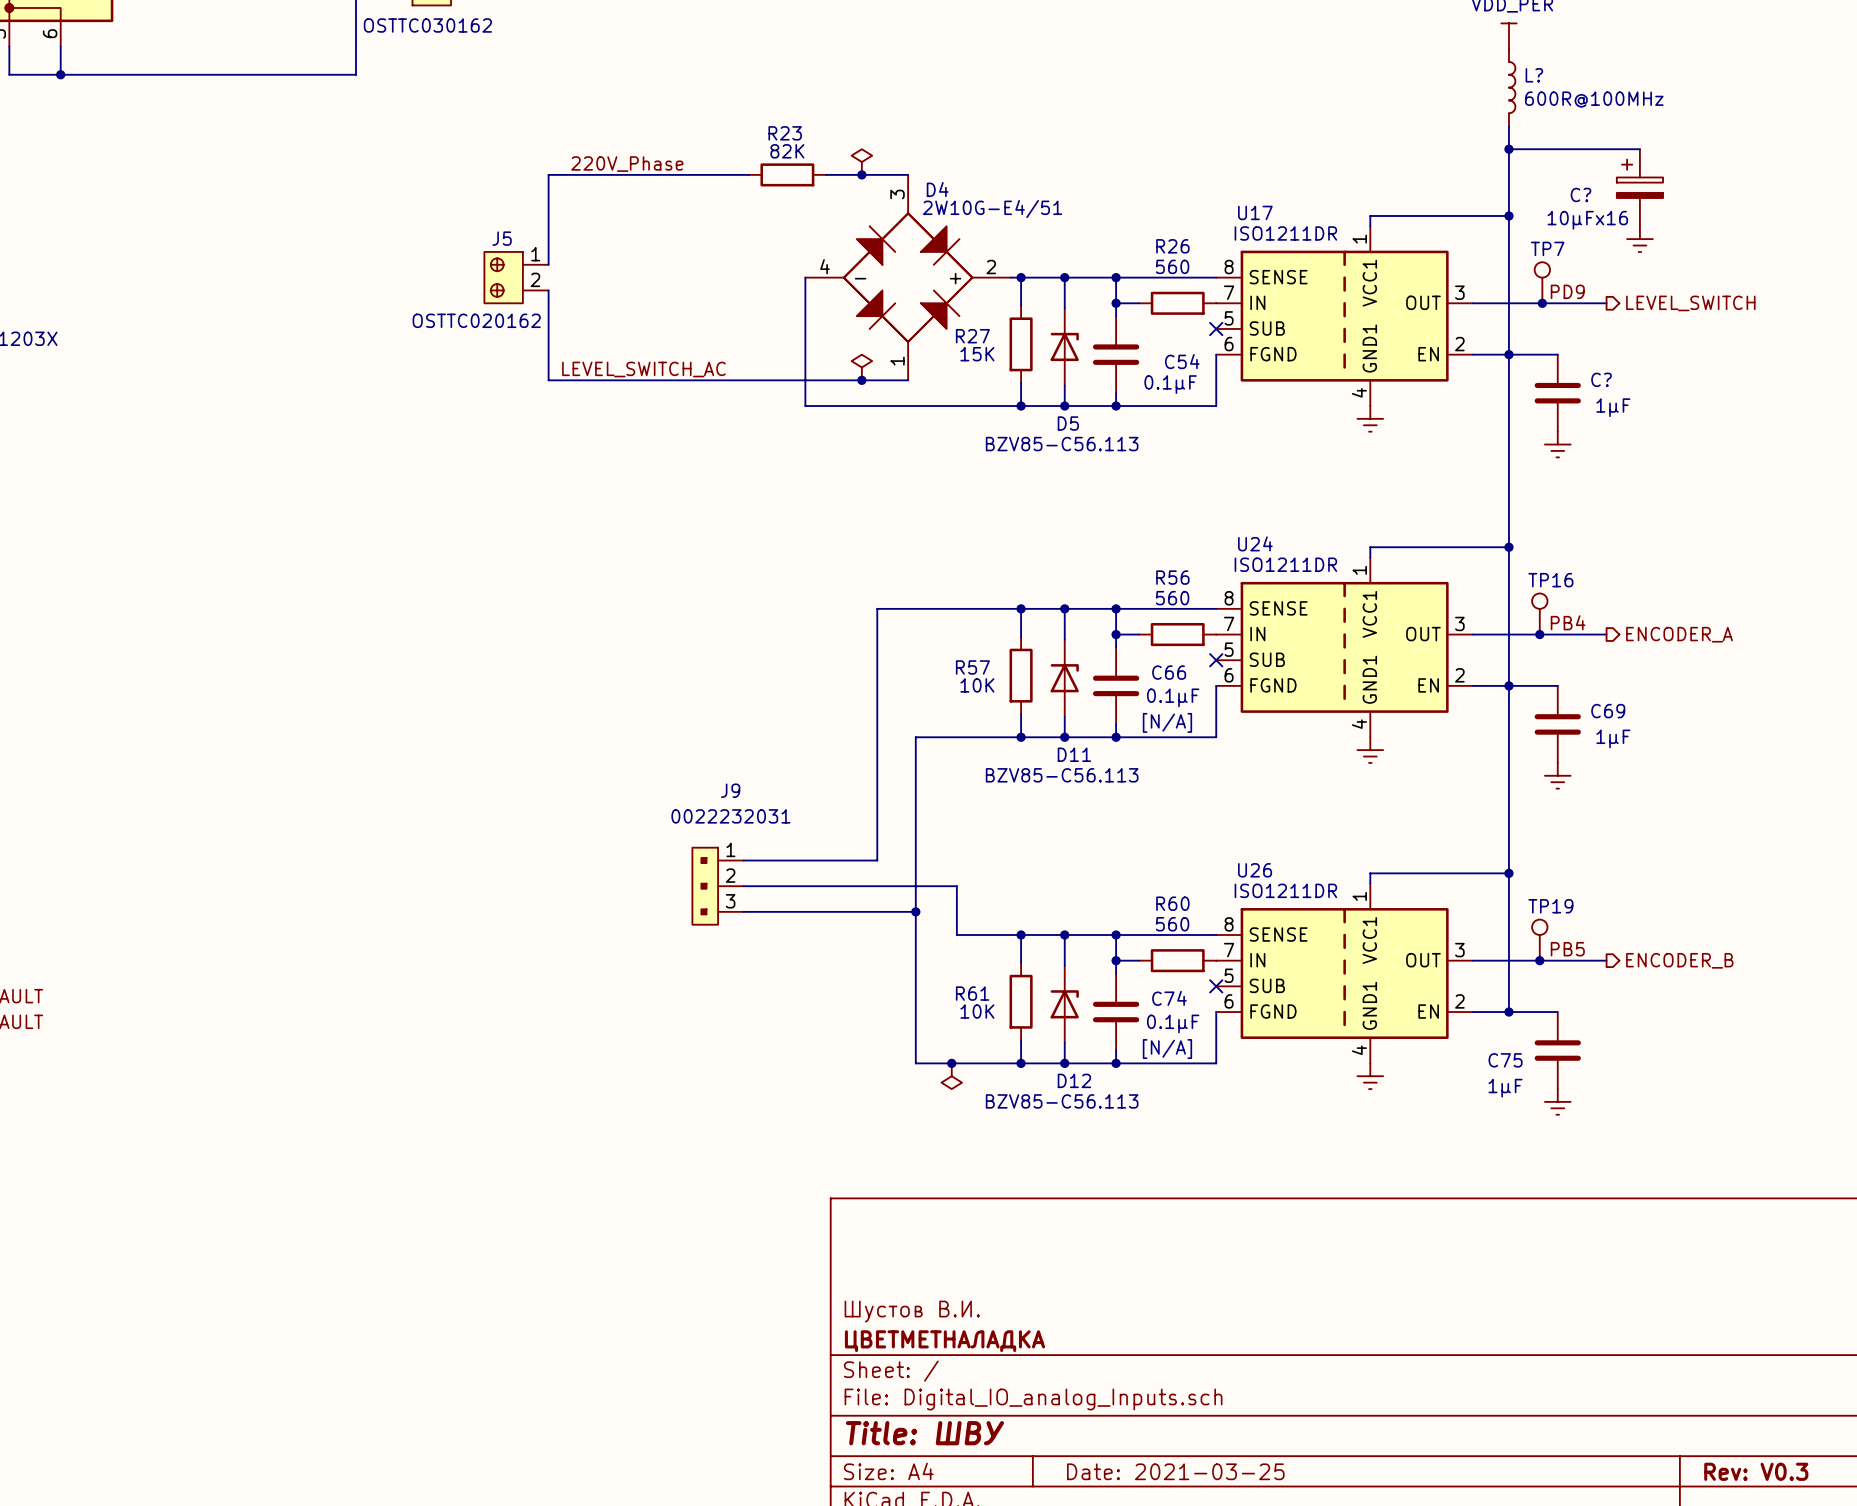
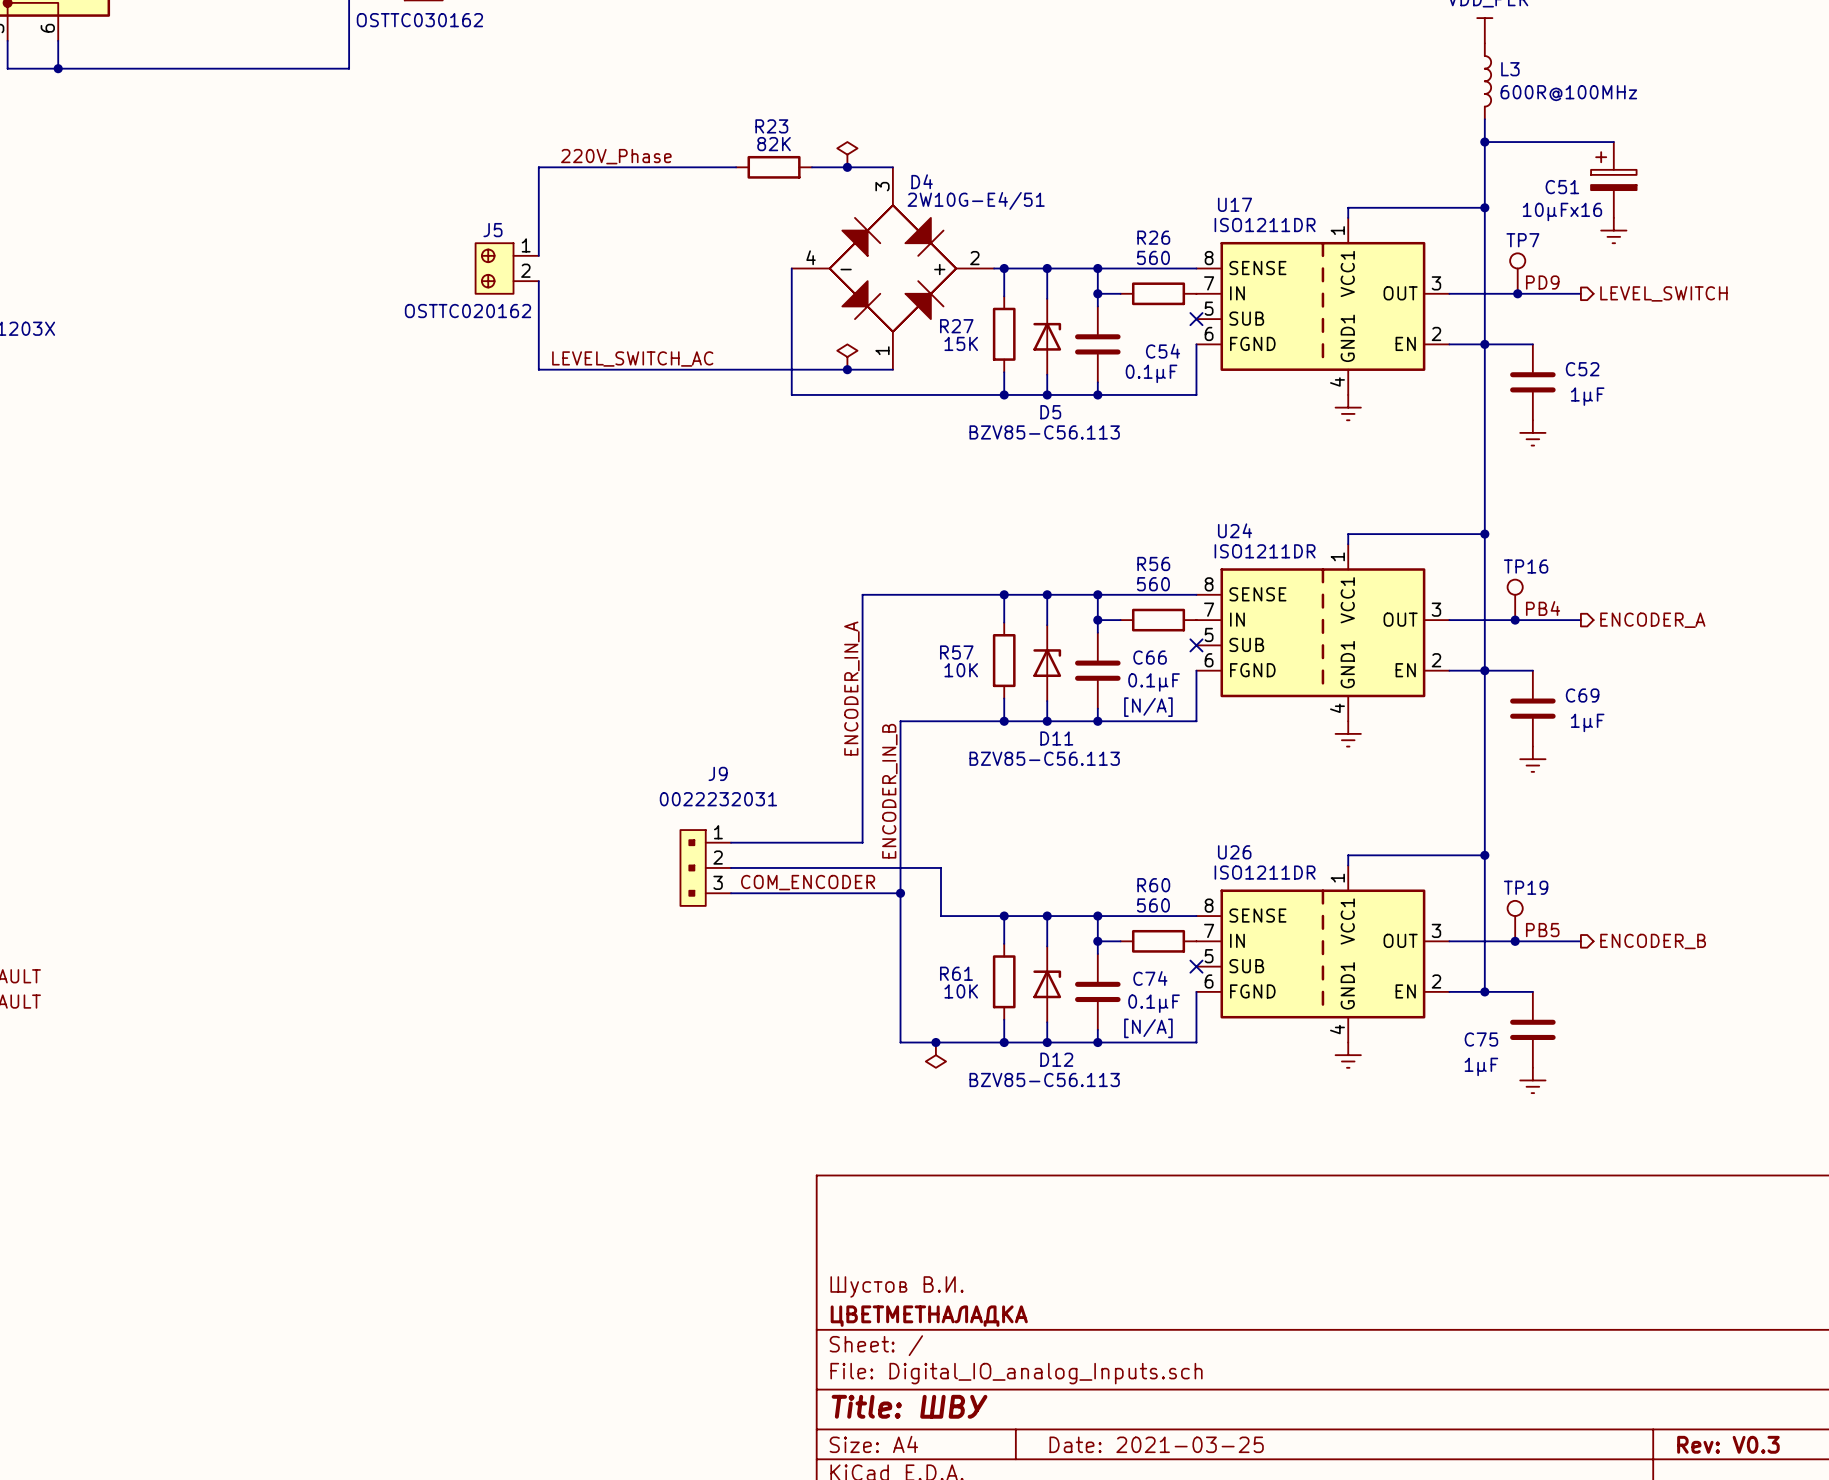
L? name: L? (1534, 75) -> L3 (1510, 69)
C? name: C? (1580, 194) -> C51 (1562, 187)
C? name: C? (1601, 379) -> C52 (1582, 369)
label: none -> ENCODER_IN_A (851, 688)
label: none -> ENCODER_IN_B (889, 791)
label: none -> COM_ENCODER (808, 882)

